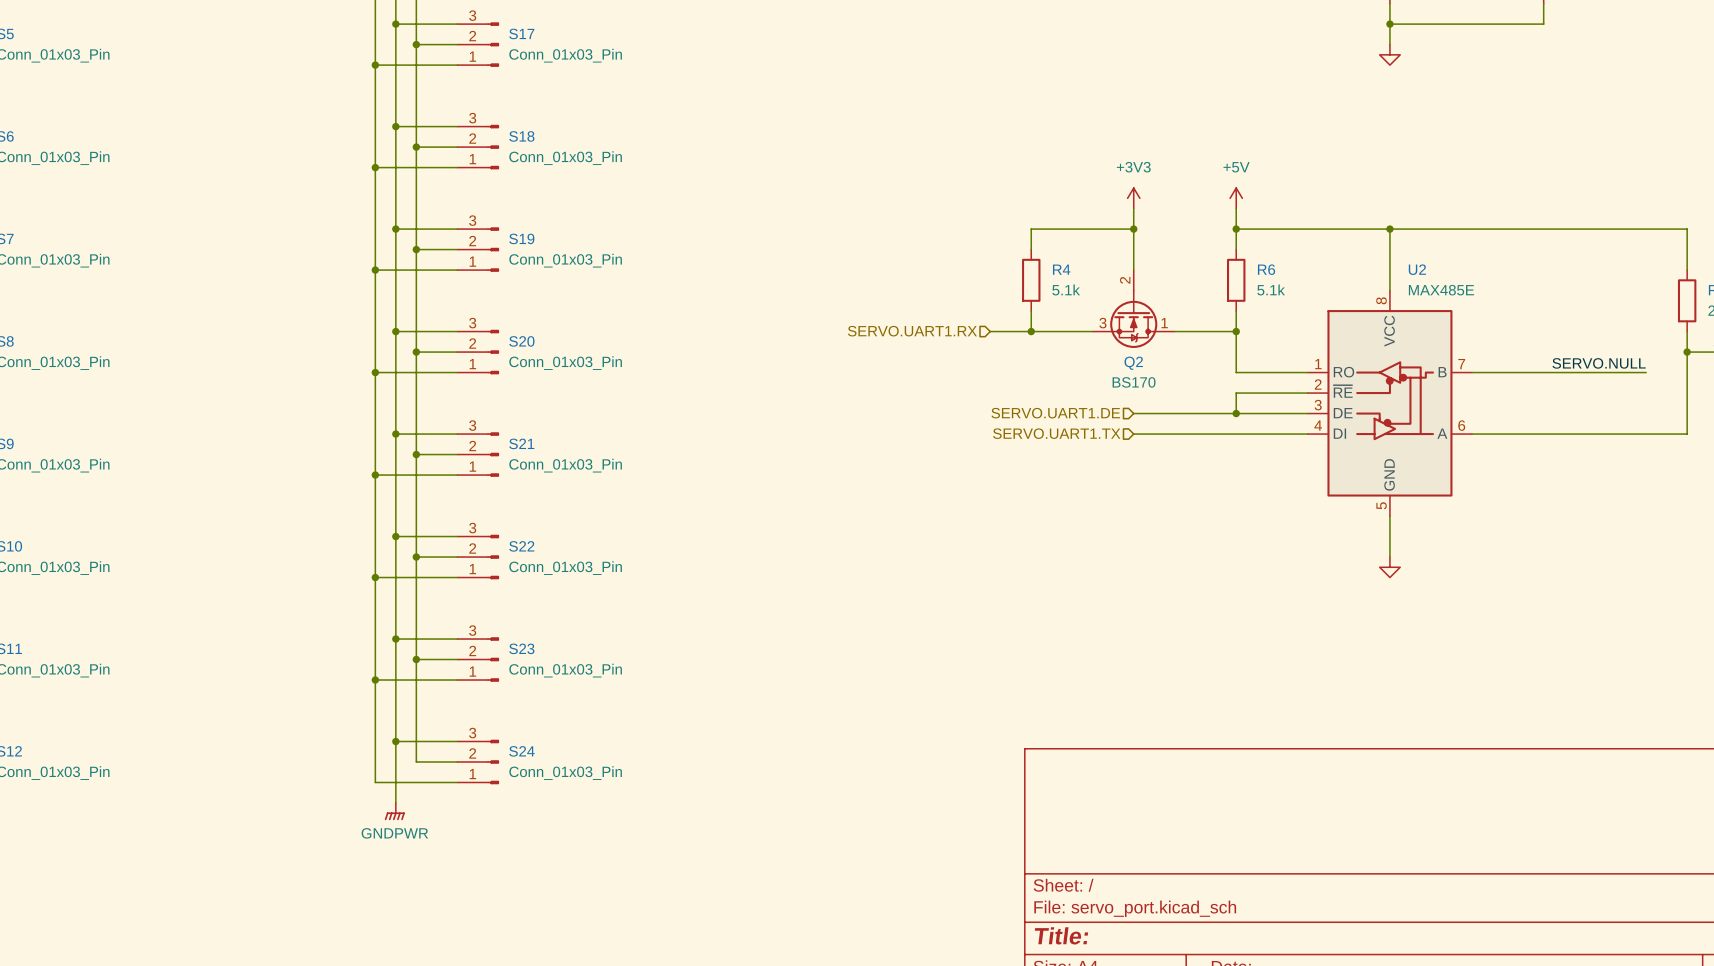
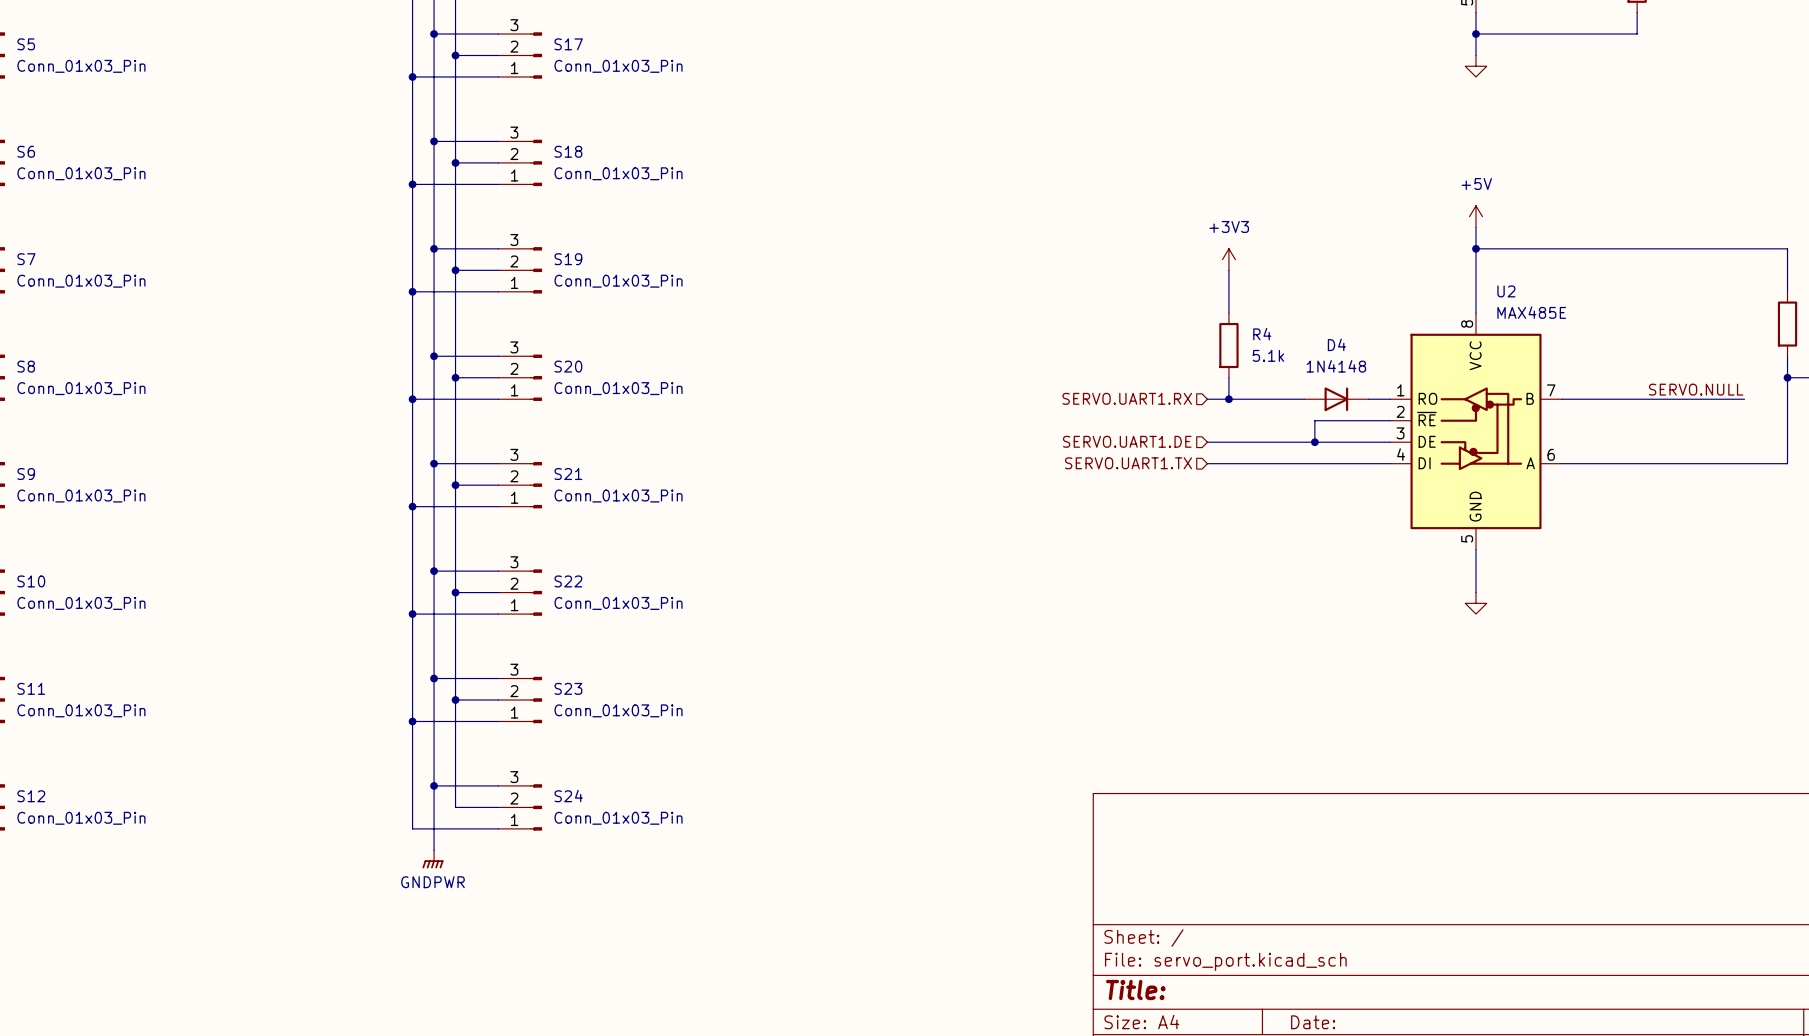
power symbol position: +3V3 (1133, 198) -> +3V3 (1228, 259)
power symbol position: +5V (1236, 198) -> +5V (1476, 216)
wire: (1133, 208) (1133, 270) -> none
wire: (1236, 208) (1236, 249) -> (1228, 270) (1228, 313)
wire: (1133, 229) (1031, 229) (1031, 249) -> none
junction: (1133, 229) -> none
wire: (1236, 229) (1389, 229) -> (1476, 227) (1476, 248)
junction: (1236, 229) -> none
R4 position: (1031, 280) -> (1228, 345)
R6: 5.1k (1236, 280) -> none
Q2: BS170 (1133, 309) -> none
wire: (1031, 311) (1031, 331) -> (1228, 377) (1228, 399)
wire: (1236, 311) (1236, 372) (1287, 372) -> none
hierarchical label position: SERVO.UART1.RX (912, 331) -> SERVO.UART1.RX (1127, 398)
wire: (990, 331) (1092, 331) -> none
junction: (1031, 331) -> none
wire: (1174, 331) (1236, 331) -> none
junction: (1236, 331) -> none
wire: none -> (1207, 399) (1304, 399)
junction: none -> (1228, 399)
D4: none -> 1N4148 (1336, 399)

